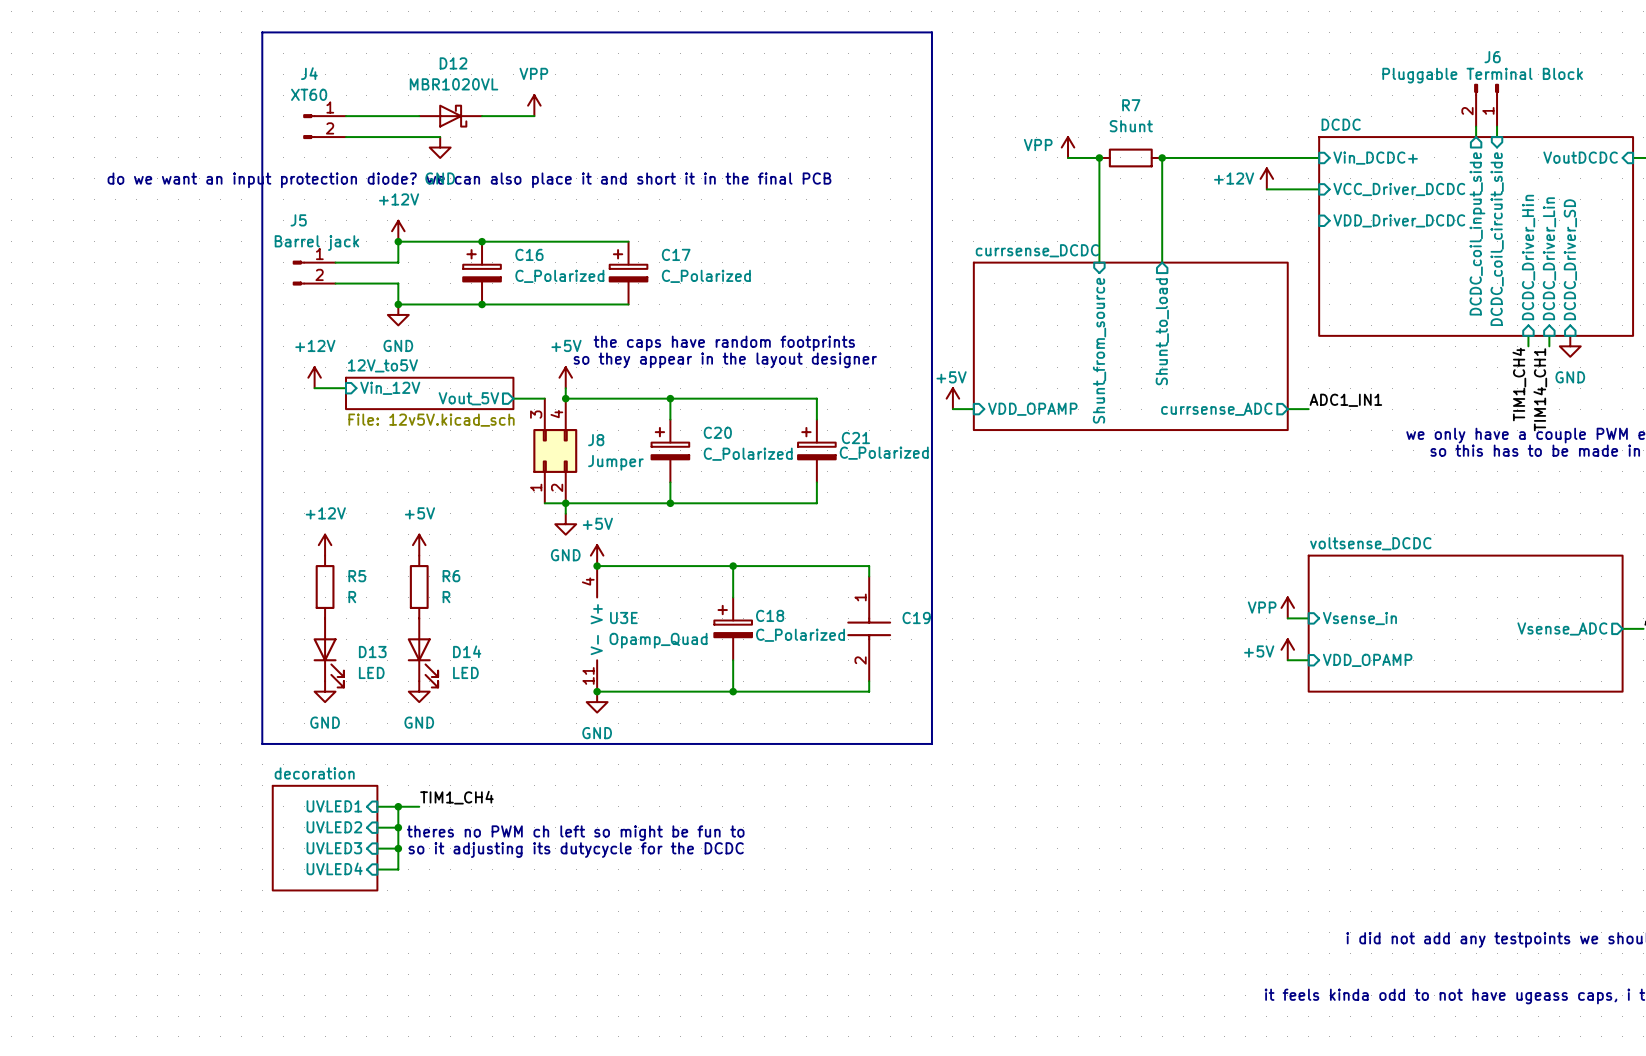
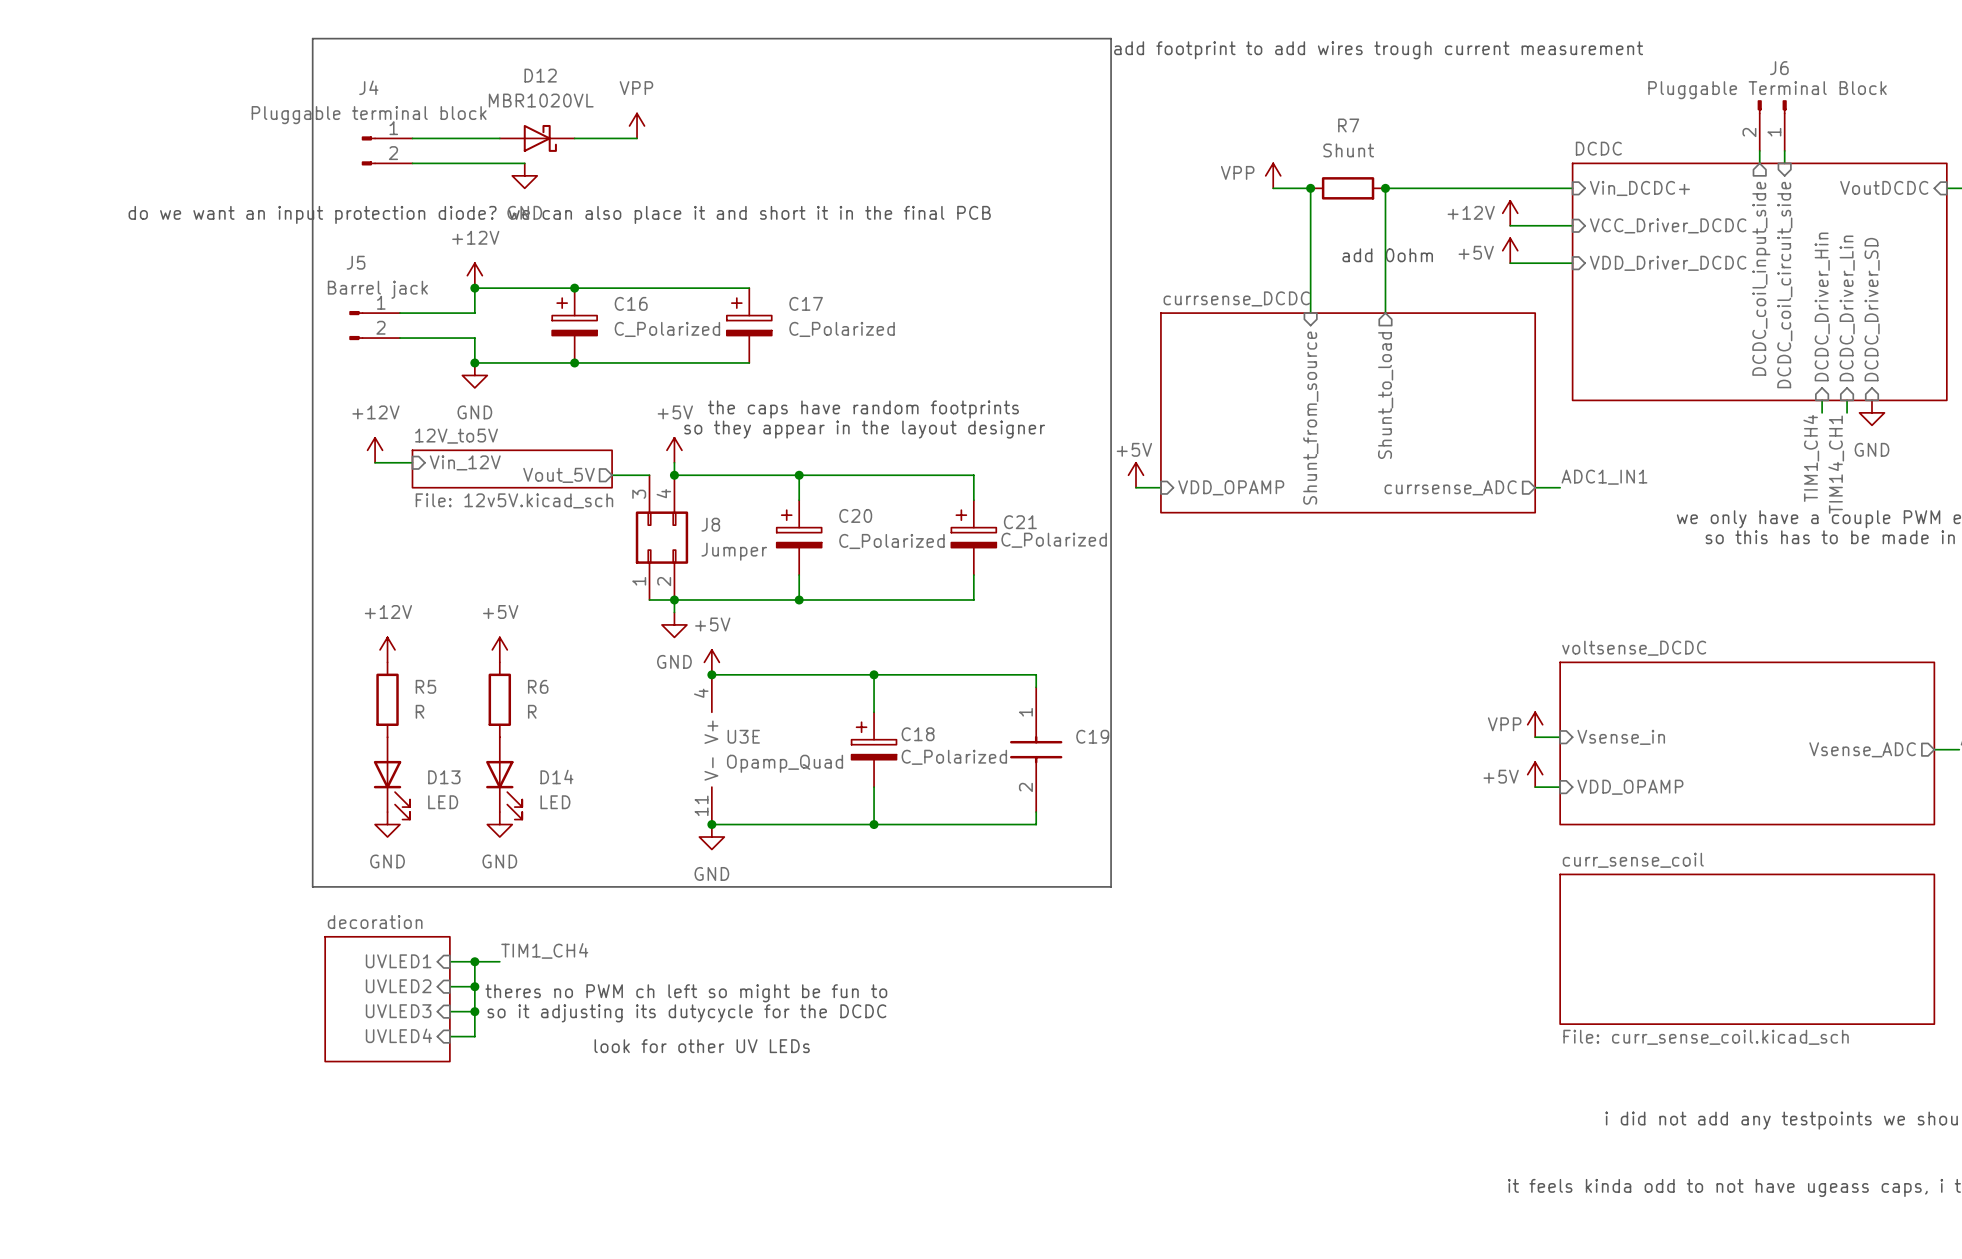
text: none -> add footprint to add wires trough current measurement (1378, 50)
J4 value: XT60 (309, 94) -> Pluggable terminal block (369, 115)
power symbol: none -> +5V (1510, 250)
text: none -> add 0ohm (1387, 255)
wire: none -> (1510, 263) (1572, 263)
sheet curr_sense_coil: none -> File: curr_sense_coil.kicad_sch (1747, 949)
text: none -> look for other UV LEDs (702, 1046)

